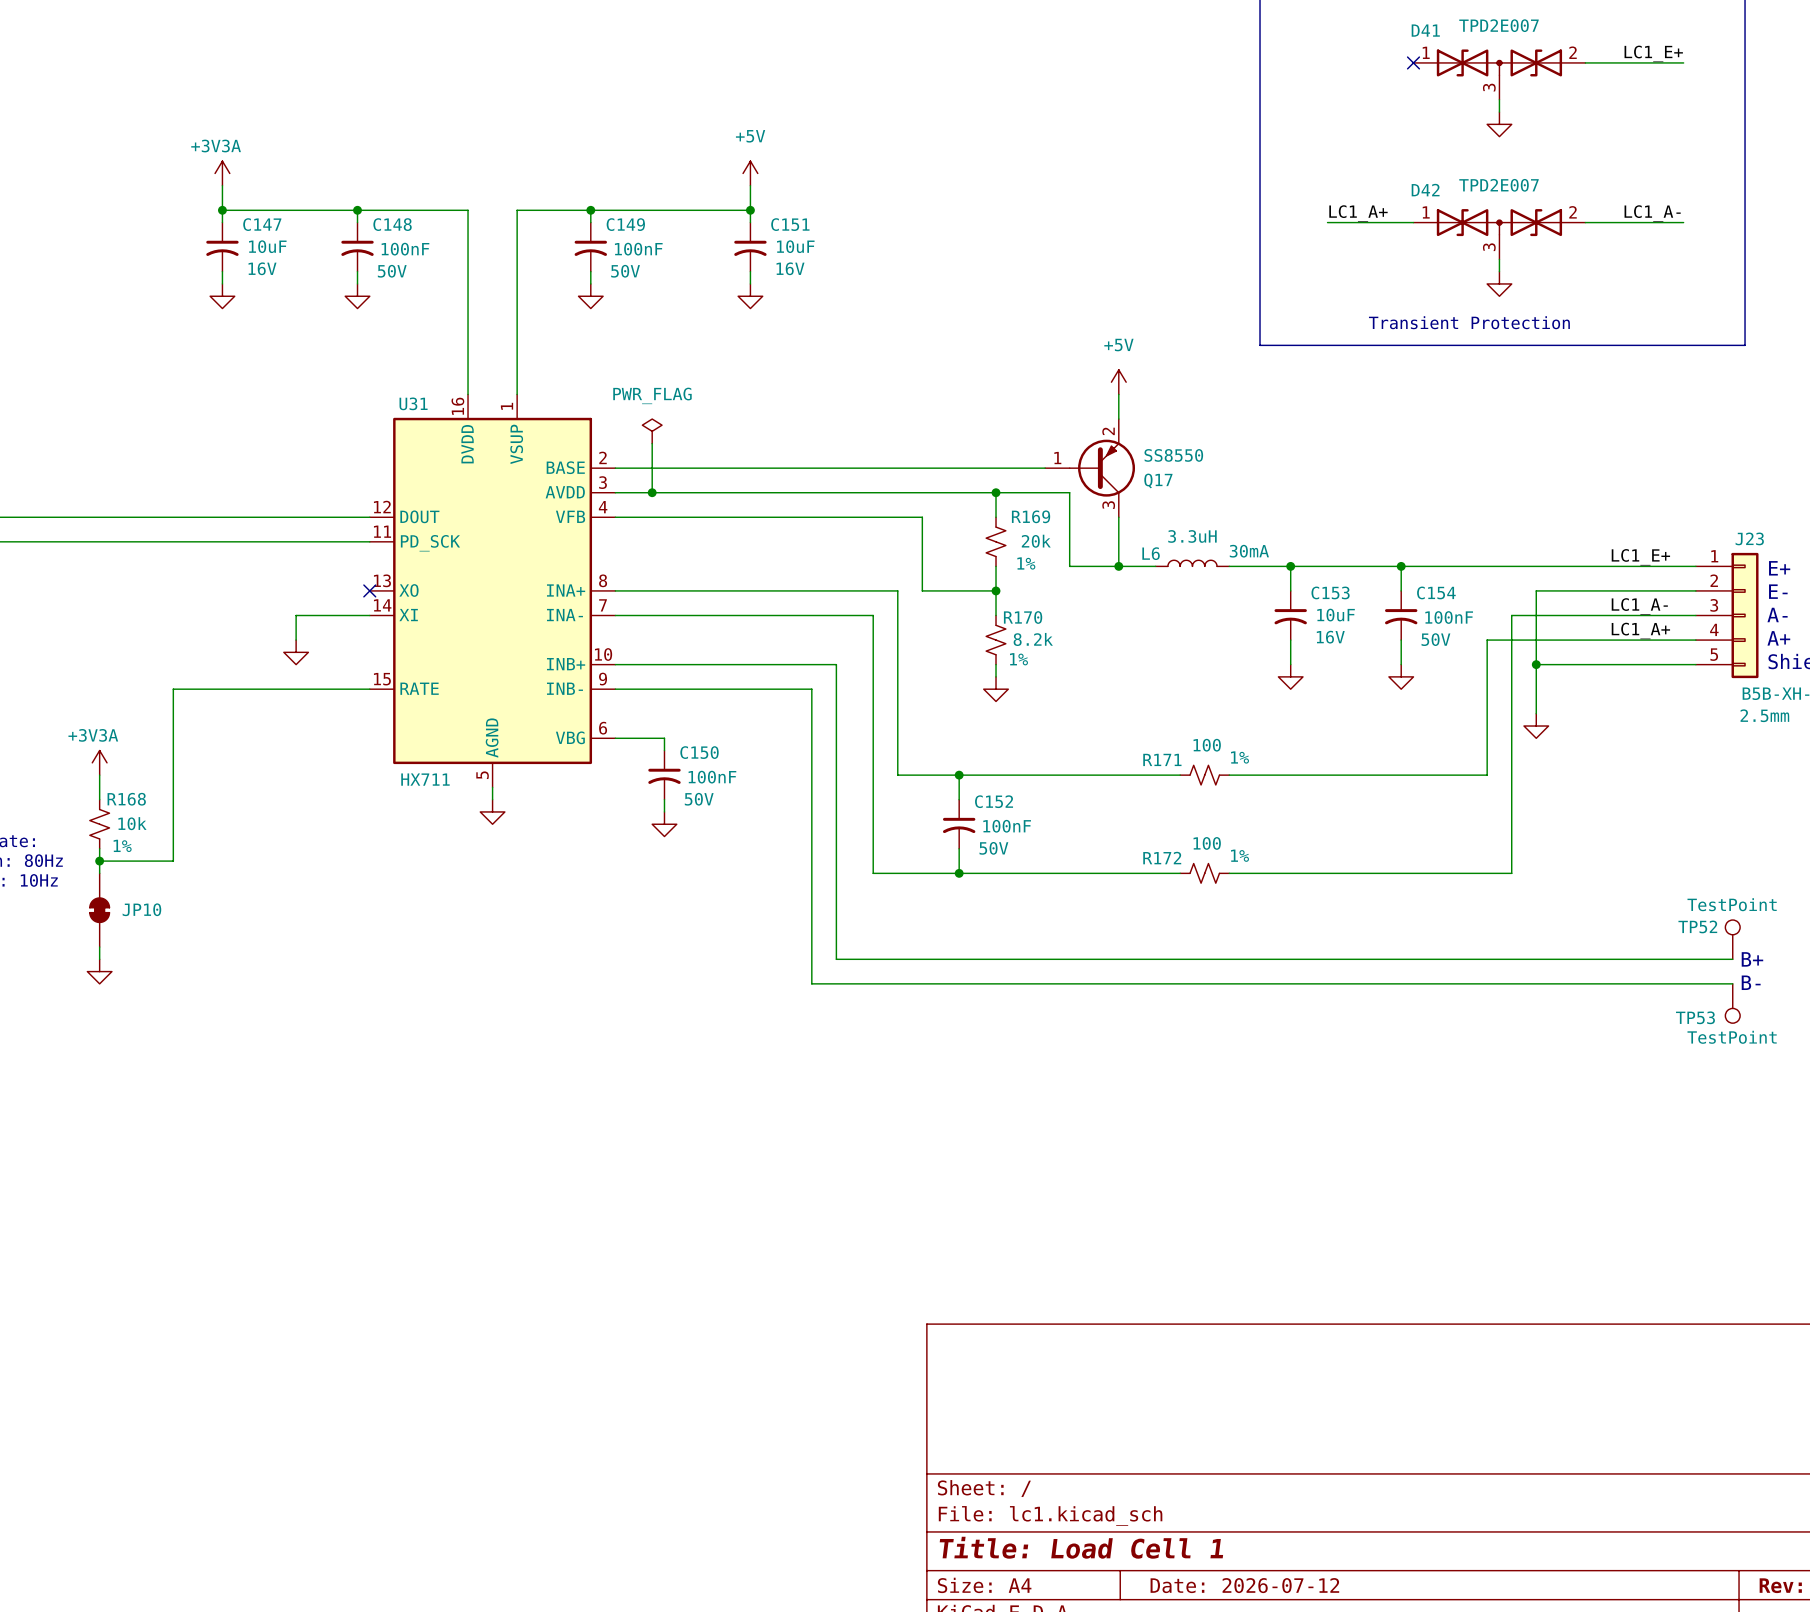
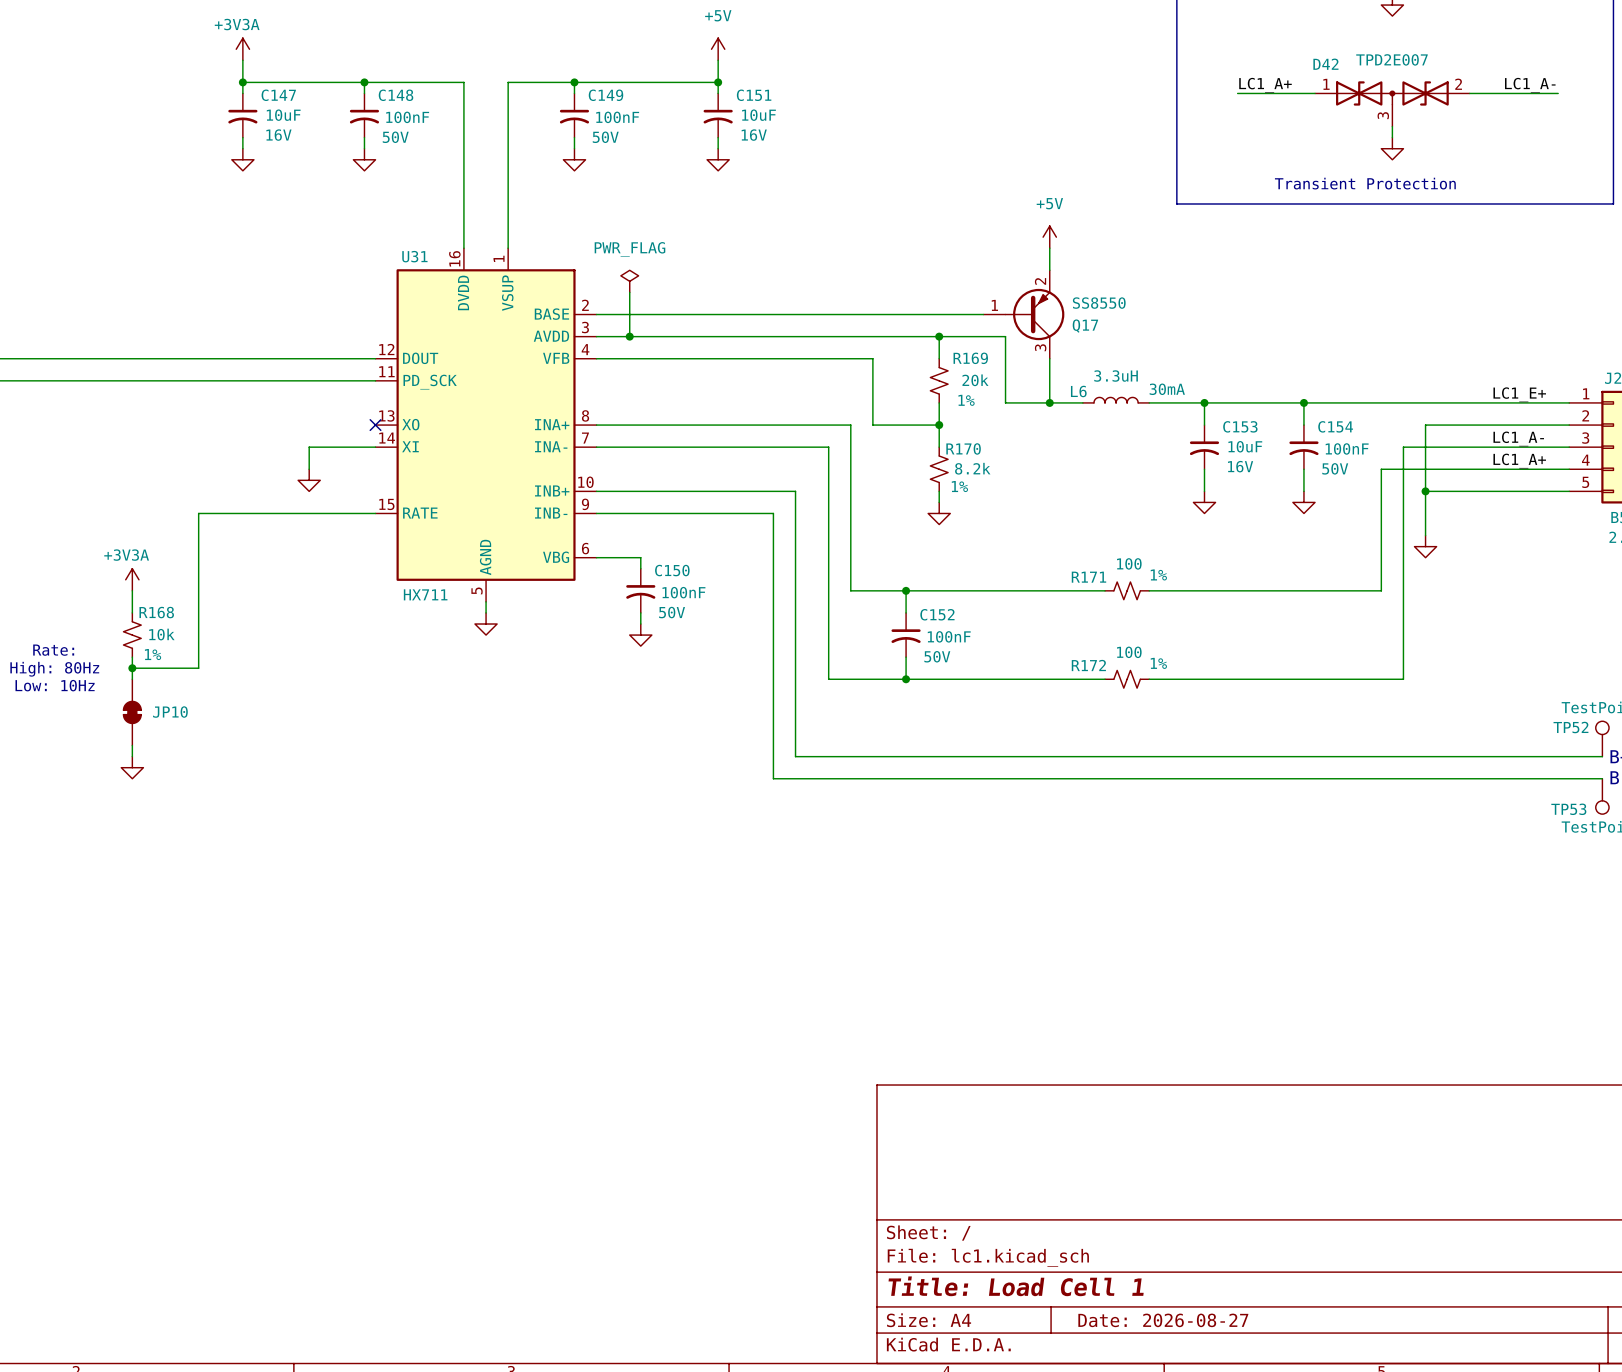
title block: Date: 2026-07-12 (1244, 1585) -> Date: 2026-08-27 (1163, 1320)

